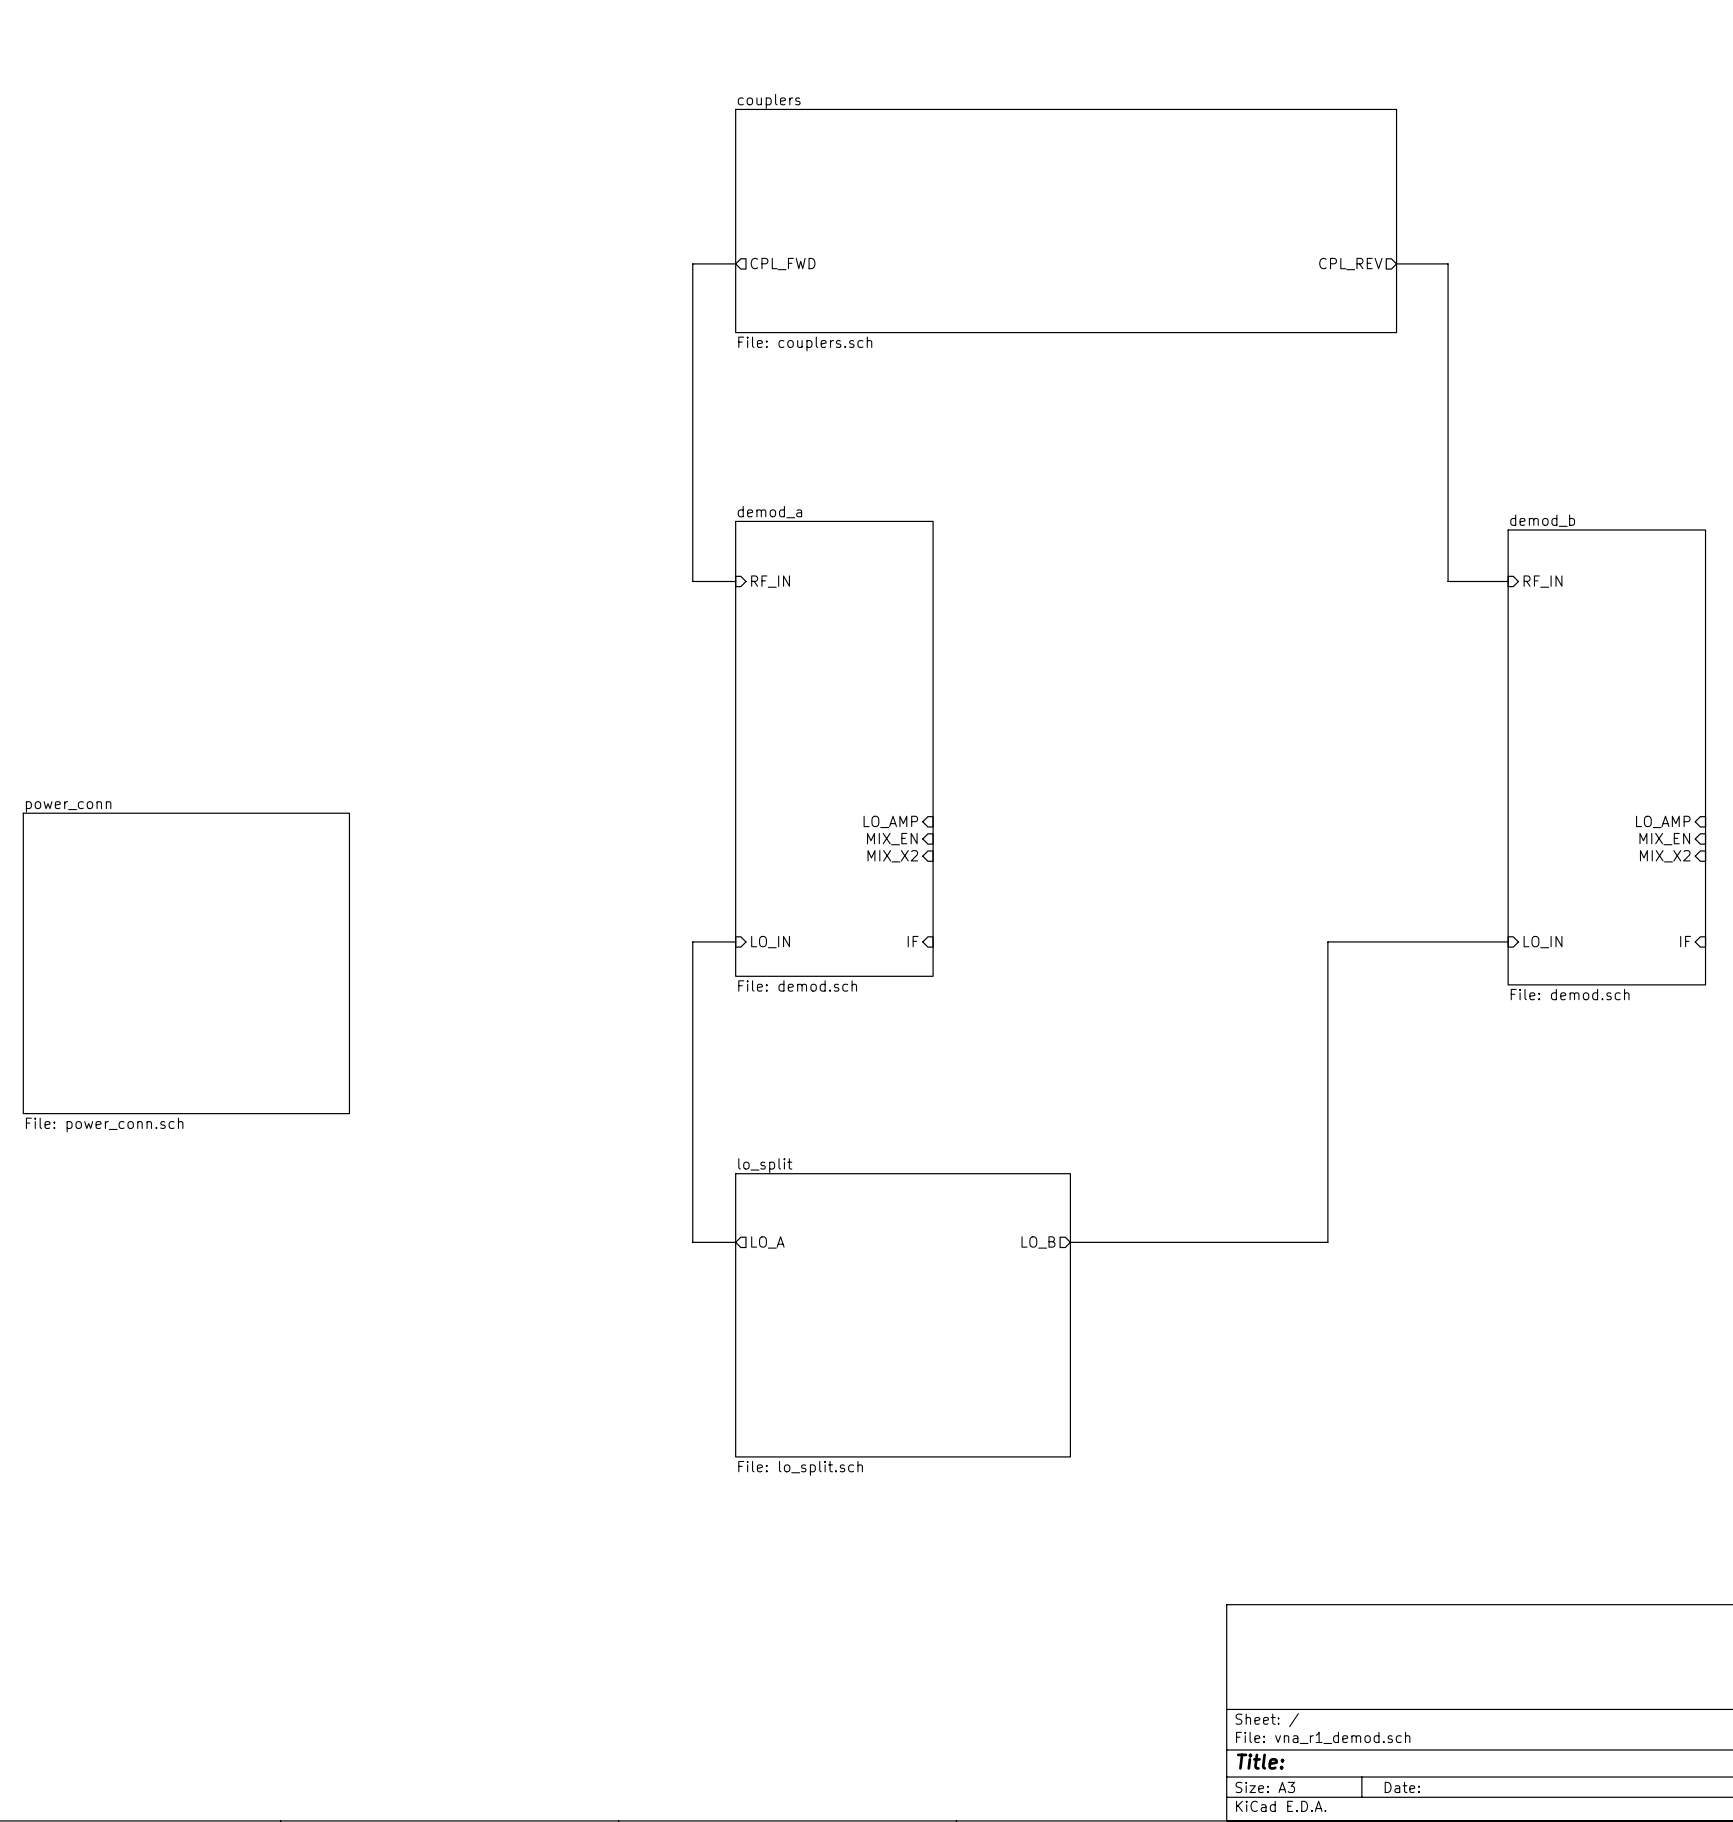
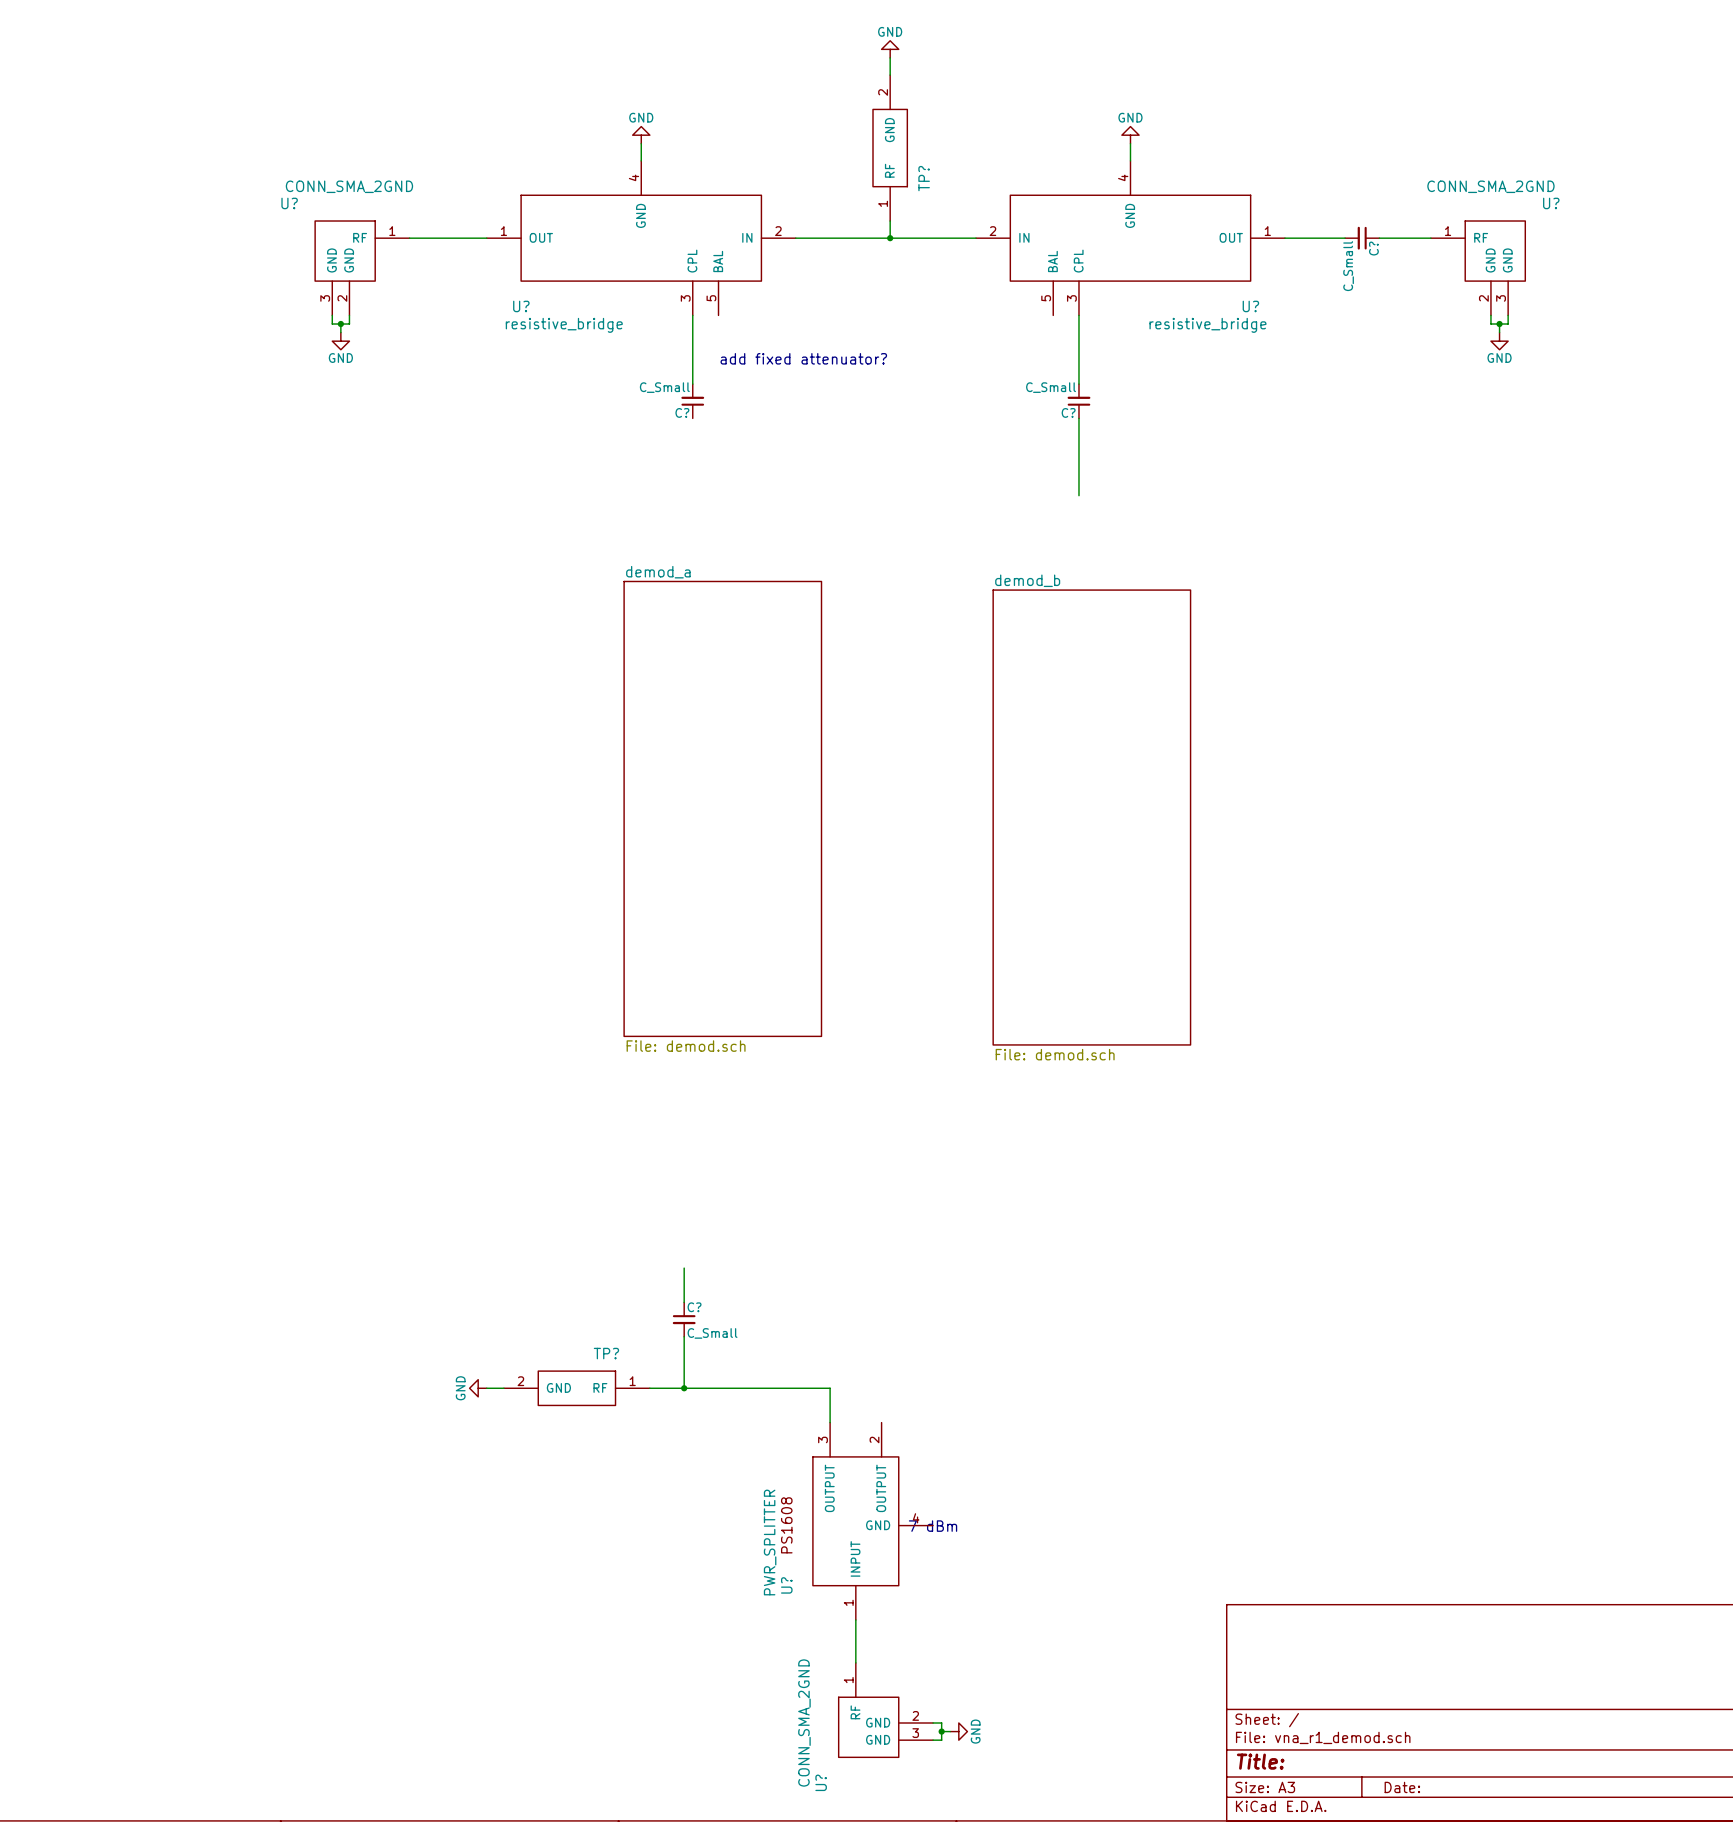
power symbol: none -> GND (890, 49)
wire: none -> (890, 57) (890, 75)
power symbol: none -> GND (641, 135)
power symbol: none -> GND (1130, 135)
wire: none -> (641, 143) (641, 160)
wire: none -> (1130, 143) (1130, 160)
TP?: none -> (890, 148)
wire: none -> (890, 221) (890, 238)
sheet couplers: File: couplers.sch (1066, 221) -> none
wire: none -> (409, 238) (486, 238)
U?: none -> resistive_bridge (641, 238)
wire: none -> (795, 238) (975, 238)
junction: none -> (890, 238)
U?: none -> resistive_bridge (1130, 238)
wire: none -> (1284, 238) (1345, 238)
C?: none -> C_Small (1362, 238)
wire: none -> (1379, 238) (1430, 238)
wire: (735, 263) (692, 263) (692, 315) -> none
wire: (1396, 263) (1448, 263) (1448, 581) (1508, 581) -> none
sheet pin: CPL_FWD (783, 264) -> none
sheet pin: CPL_REV (1350, 264) -> none
U?: none -> CONN_SMA_2GND (362, 268)
U?: none -> CONN_SMA_2GND (1478, 268)
wire: none -> (332, 315) (332, 324) (349, 324) (349, 315)
wire: none -> (1078, 315) (1078, 384)
wire: none -> (1490, 315) (1490, 324) (1508, 324) (1508, 315)
wire: none -> (340, 324) (340, 332)
junction: none -> (340, 324)
wire: none -> (1499, 324) (1499, 332)
junction: none -> (1499, 324)
power symbol: none -> GND (340, 341)
power symbol: none -> GND (1499, 341)
text: none -> add fixed attenuator? (803, 358)
wire: (692, 384) (692, 581) (735, 581) -> none
C?: none -> C_Small (692, 401)
C?: none -> C_Small (1078, 401)
wire: none -> (1078, 418) (1078, 495)
sheet pin: RF_IN (770, 581) -> none
sheet pin: RF_IN (1543, 581) -> none
sheet demod_a position: (834, 748) -> (722, 808)
sheet demod_b: File: demod.sch (1606, 757) -> none
sheet demod_b: none -> File: demod.sch (1091, 817)
sheet pin: LO_AMP (890, 821) -> none
sheet pin: LO_AMP (1663, 821) -> none
sheet pin: MIX_EN (892, 839) -> none
sheet pin: MIX_EN (1664, 839) -> none
sheet pin: MIX_X2 (892, 856) -> none
sheet pin: MIX_X2 (1665, 856) -> none
wire: (735, 941) (692, 941) (692, 1242) (735, 1242) -> none
sheet pin: IF (913, 941) -> none
wire: (1508, 941) (1327, 941) (1327, 1242) (1070, 1242) -> none
sheet pin: IF (1685, 941) -> none
sheet pin: LO_IN (770, 942) -> none
sheet pin: LO_IN (1543, 942) -> none
sheet power_conn: File: power_conn.sch (186, 963) -> none
sheet pin: LO_A (767, 1242) -> none
sheet pin: LO_B (1038, 1242) -> none
wire: none -> (684, 1268) (684, 1302)
sheet lo_split: File: lo_split.sch (903, 1315) -> none
C?: none -> C_Small (684, 1319)
wire: none -> (684, 1336) (684, 1388)
power symbol: none -> GND (478, 1388)
wire: none -> (486, 1388) (503, 1388)
TP?: none -> (576, 1388)
wire: none -> (649, 1388) (830, 1388) (830, 1422)
junction: none -> (684, 1388)
U?: none -> PWR_SPLITTER (873, 1521)
text: none -> 7 dBm (933, 1526)
wire: none -> (855, 1620) (855, 1662)
U?: none -> CONN_SMA_2GND (885, 1710)
wire: none -> (933, 1723) (941, 1723) (941, 1740) (933, 1740)
wire: none -> (941, 1731) (950, 1731)
junction: none -> (941, 1731)
power symbol: none -> GND (958, 1731)

